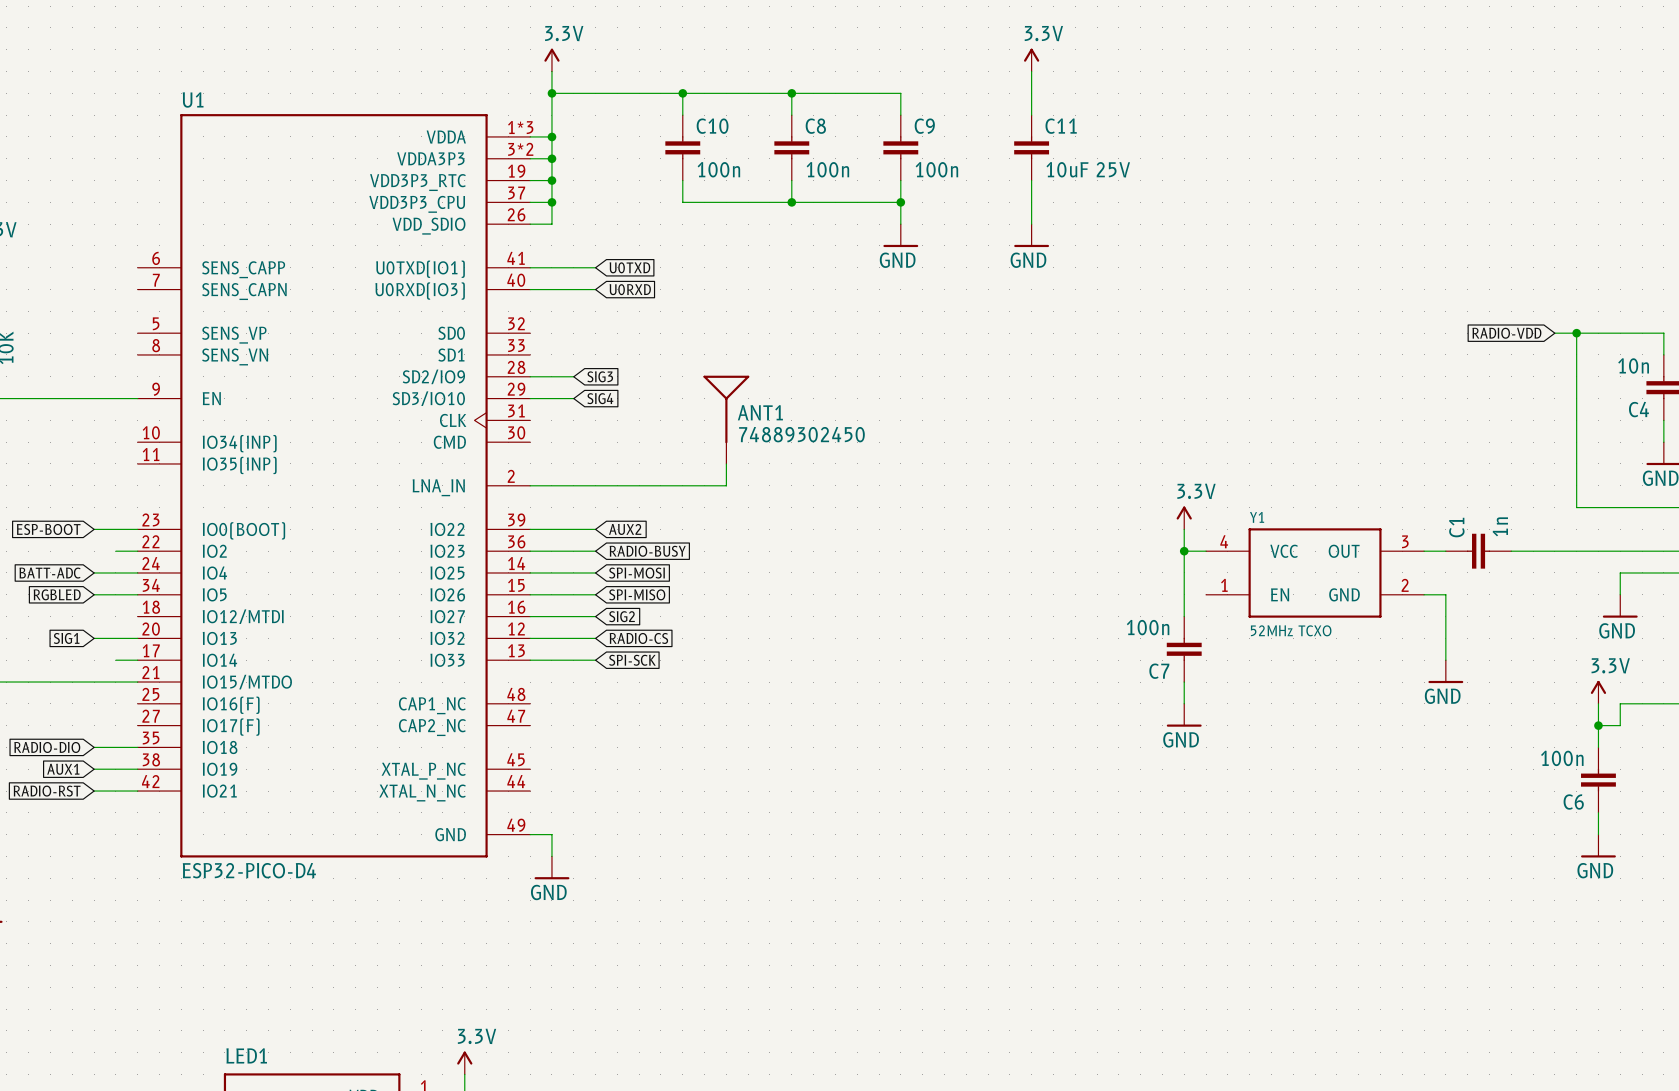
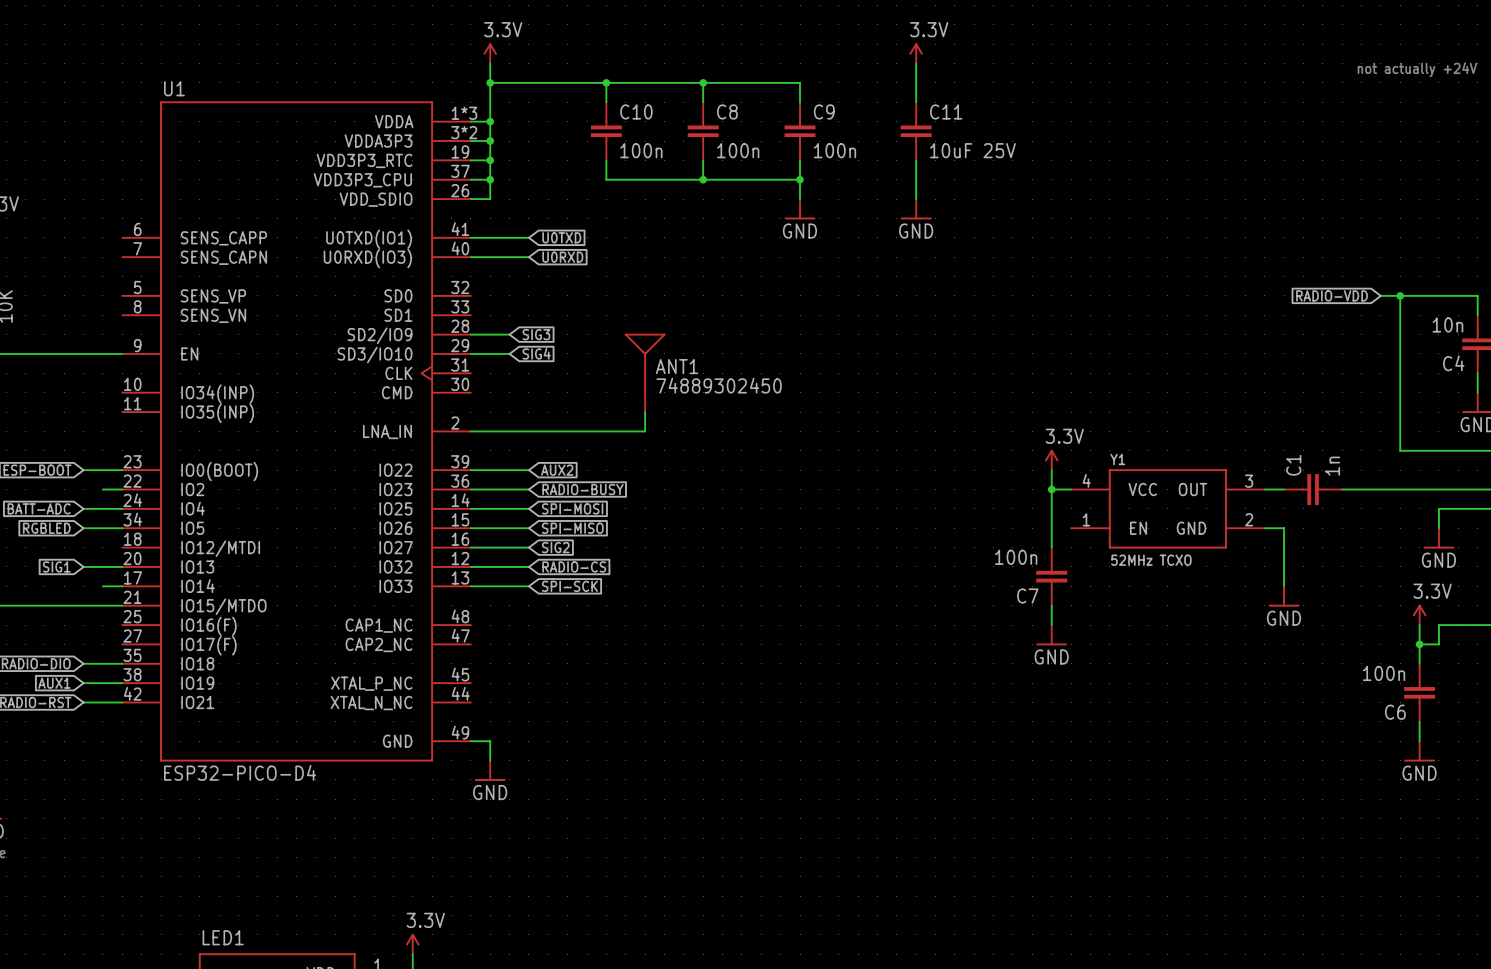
text: none -> not actually +24V (1417, 69)

